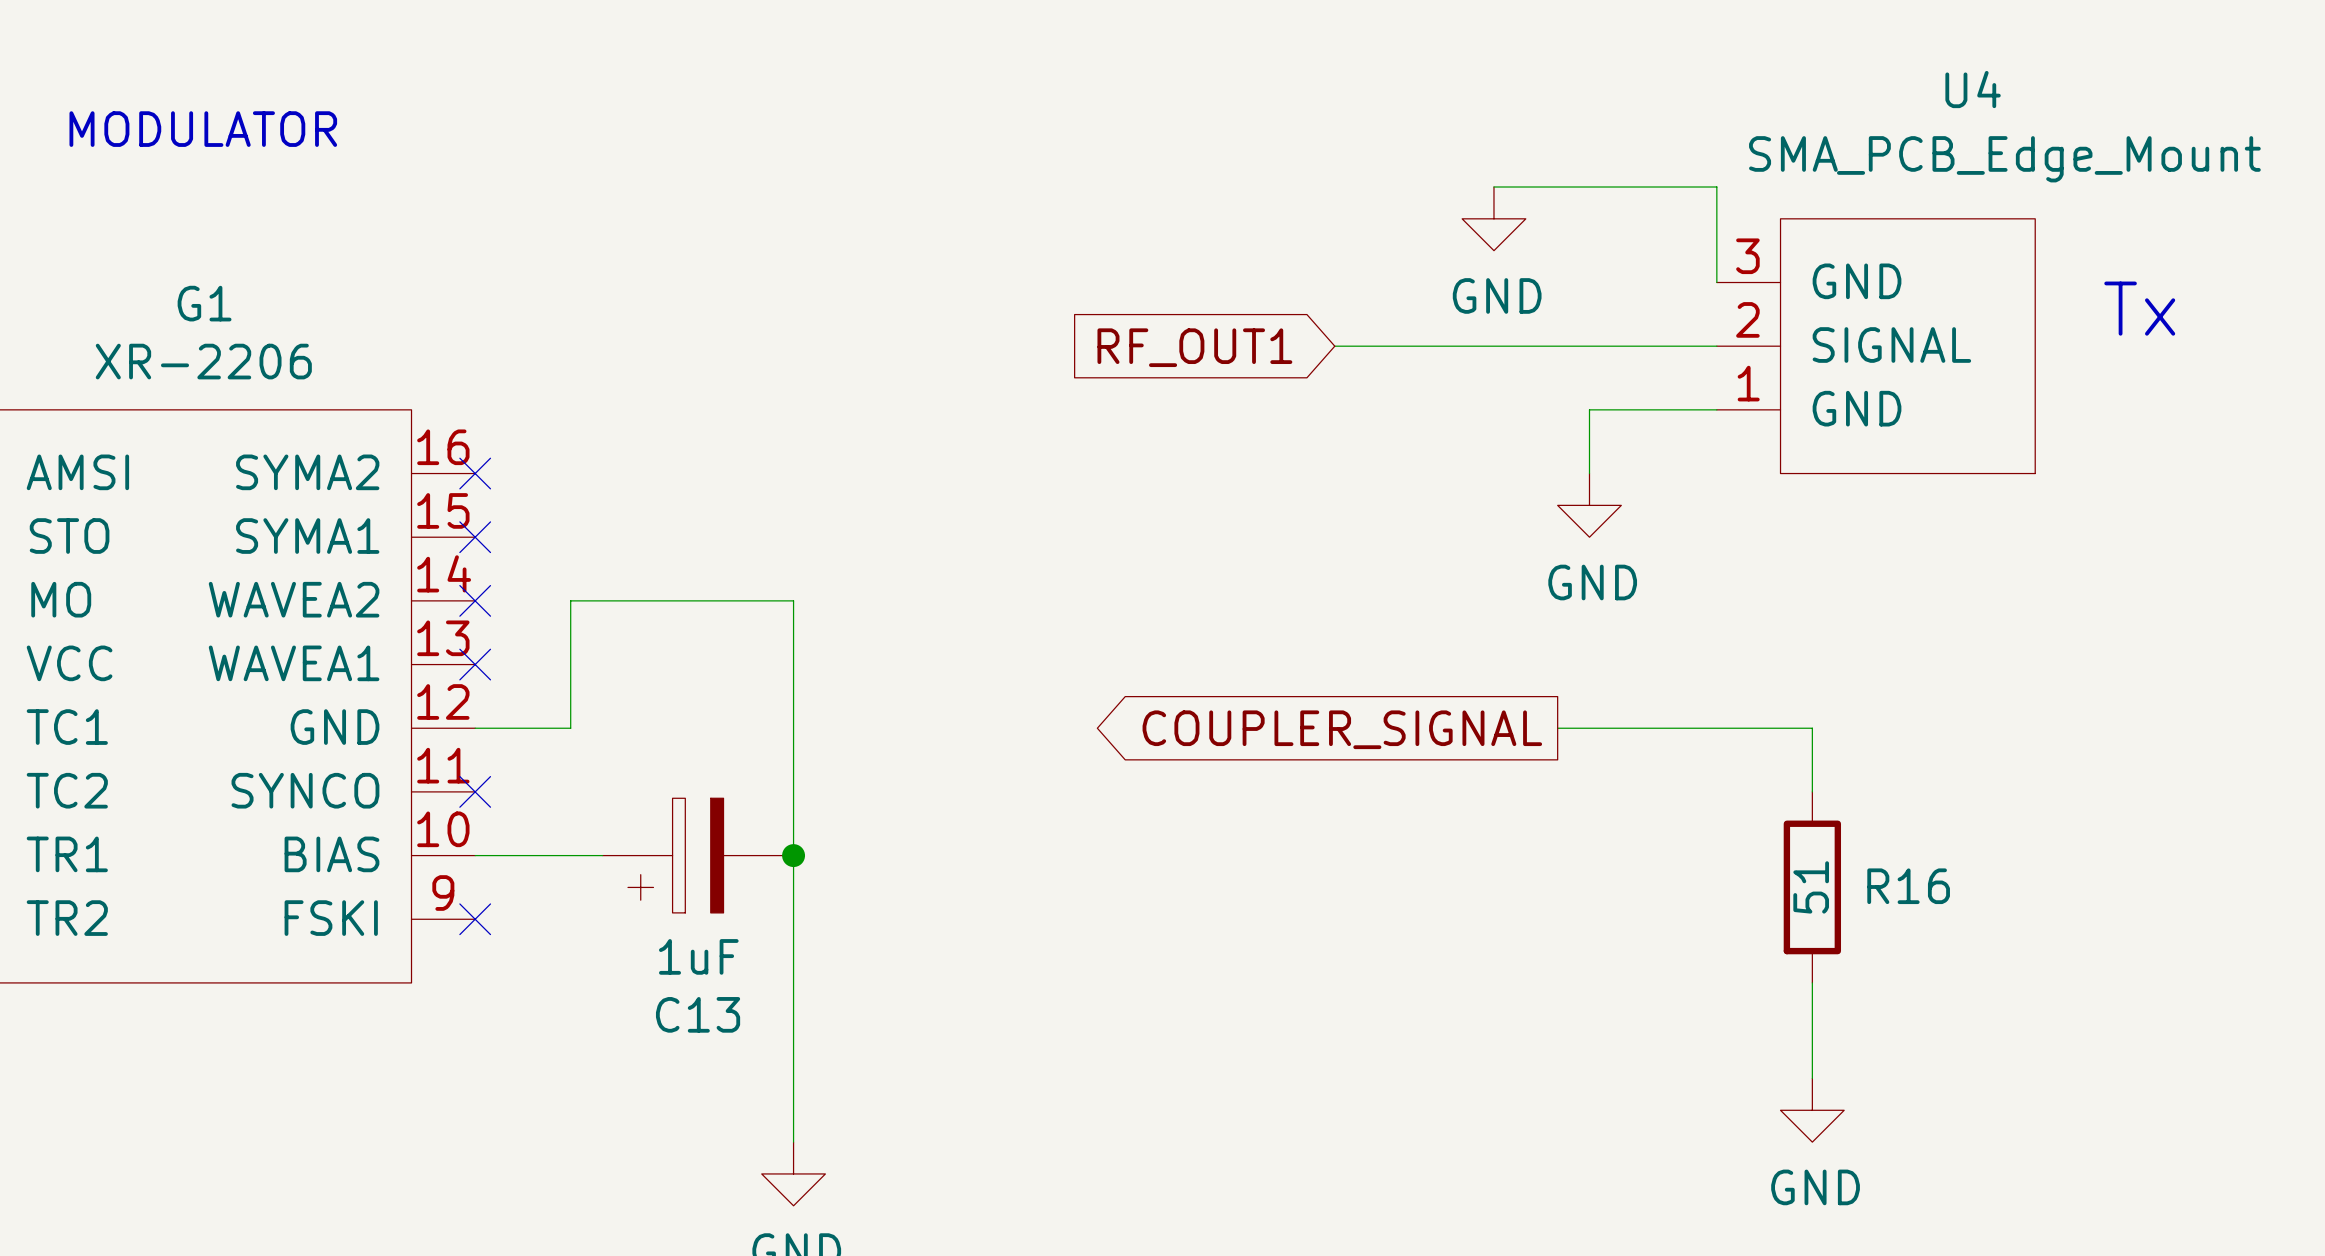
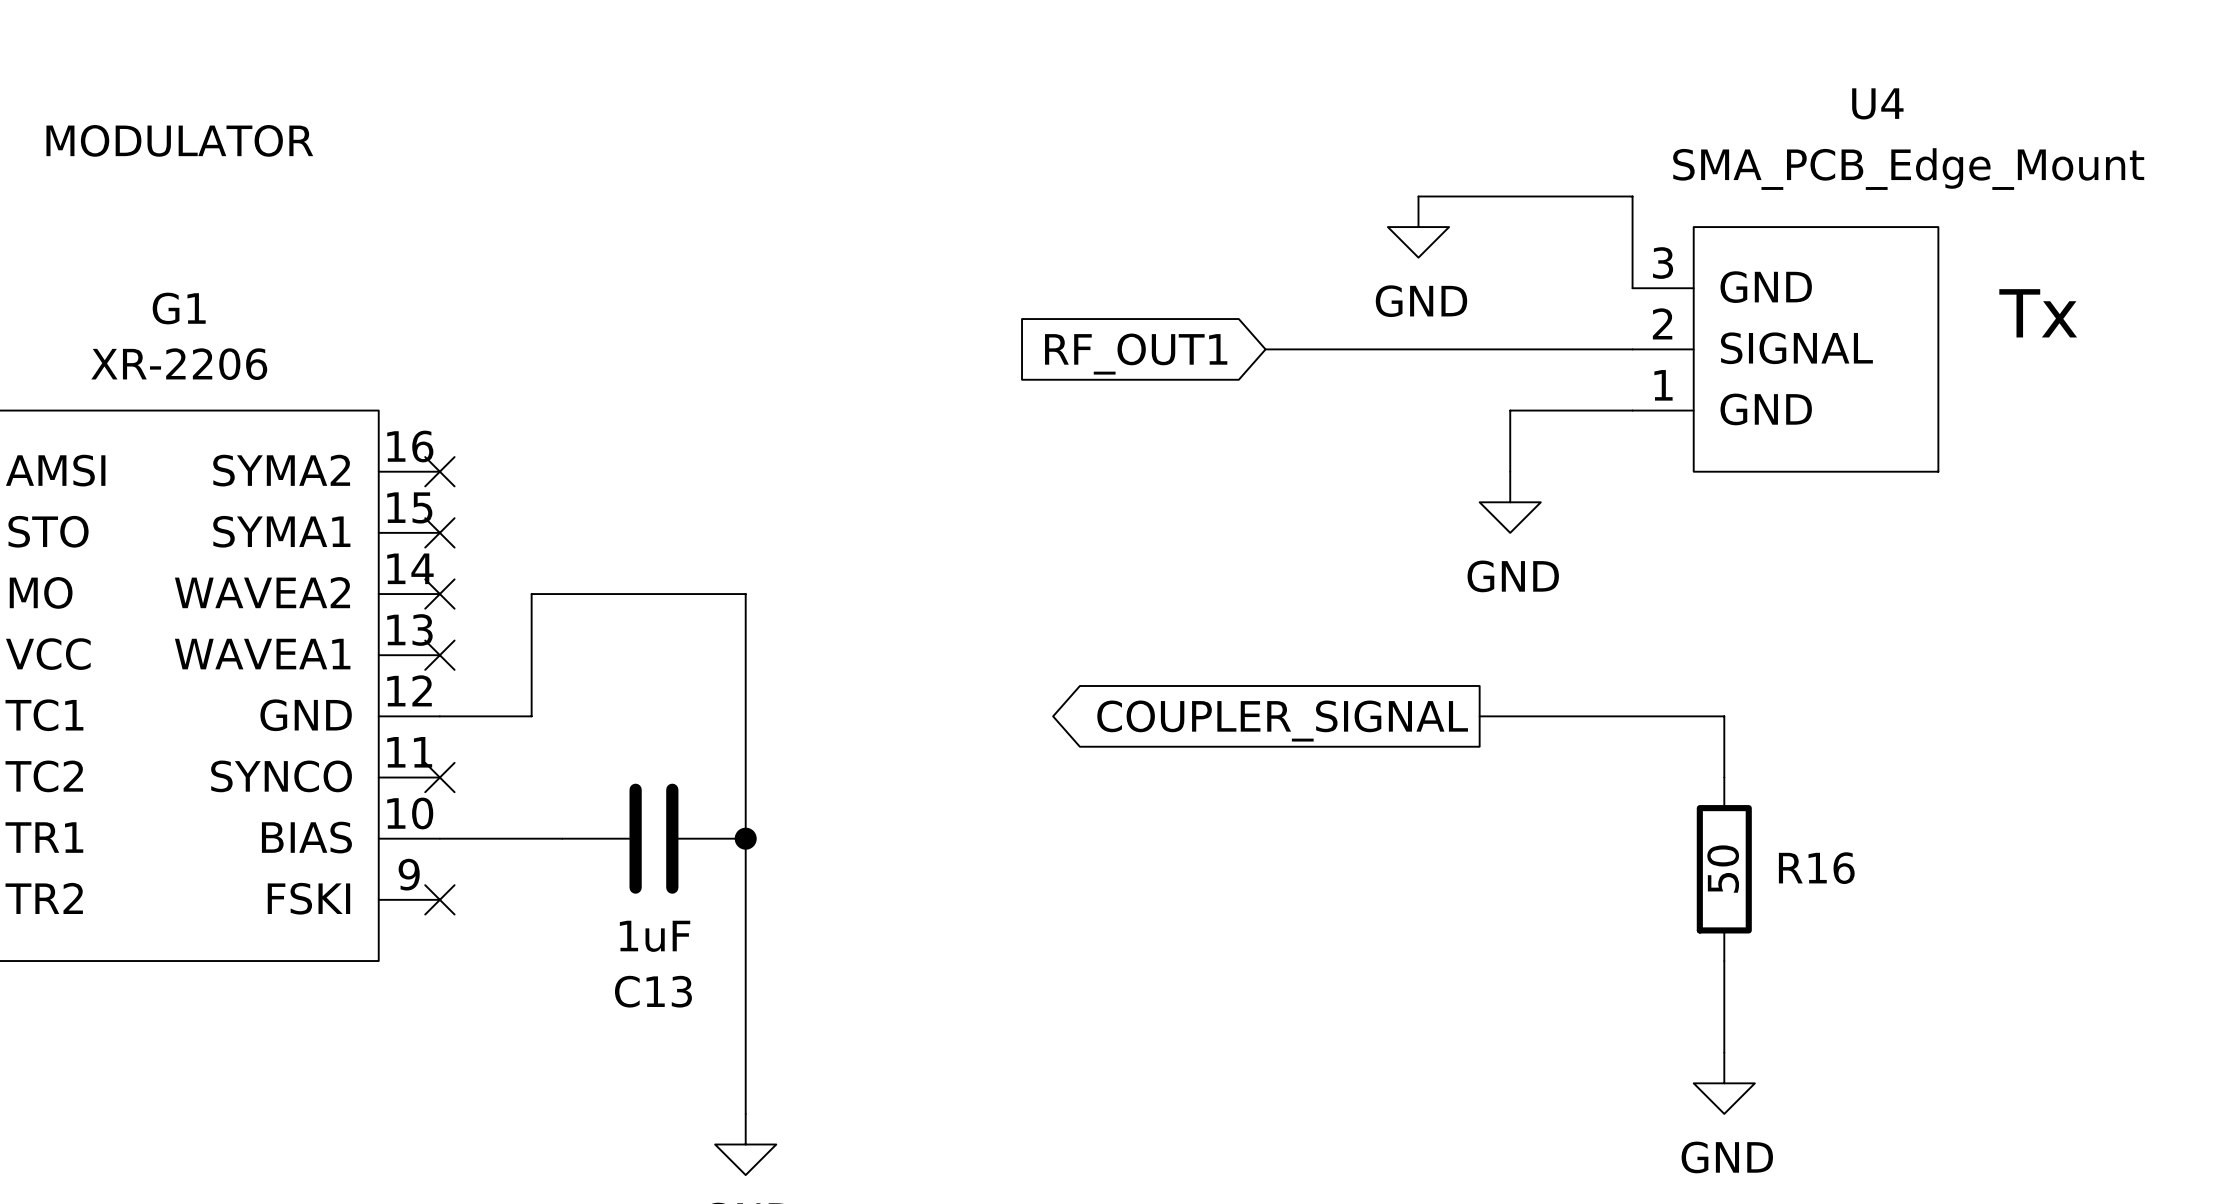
C13 symbol: [602, 798, 794, 913] -> [562, 783, 746, 894]
R16 value: 51 (1811, 887) -> 50 (1723, 869)

